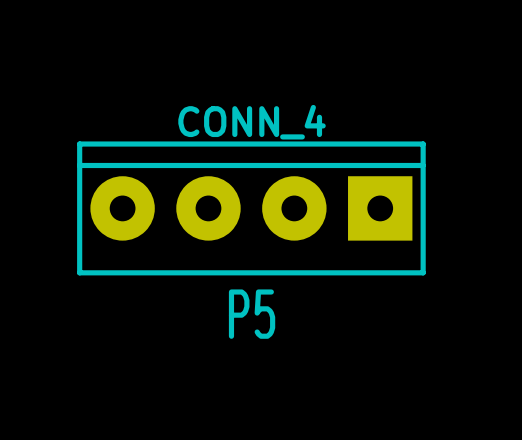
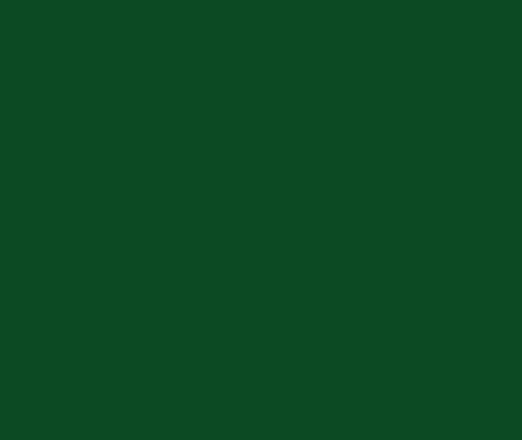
P5: CONN_4 (251, 208) -> none

